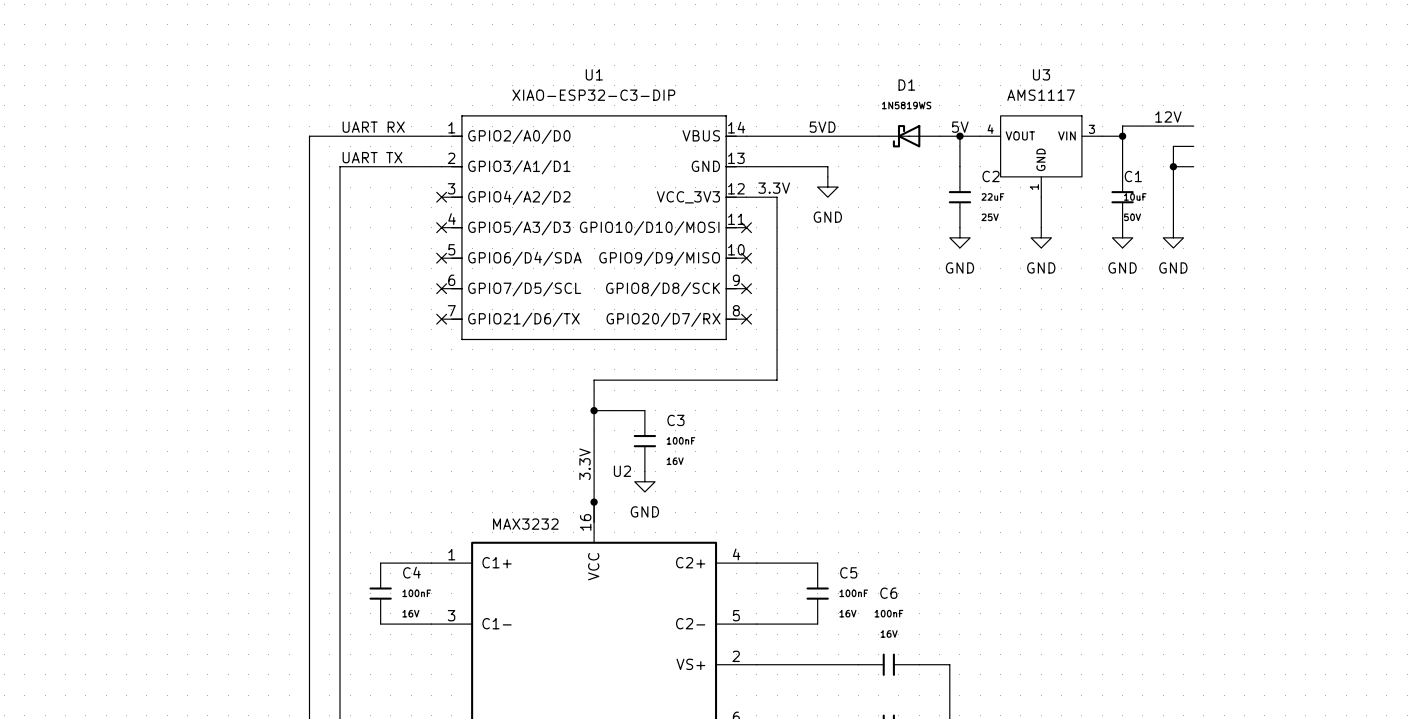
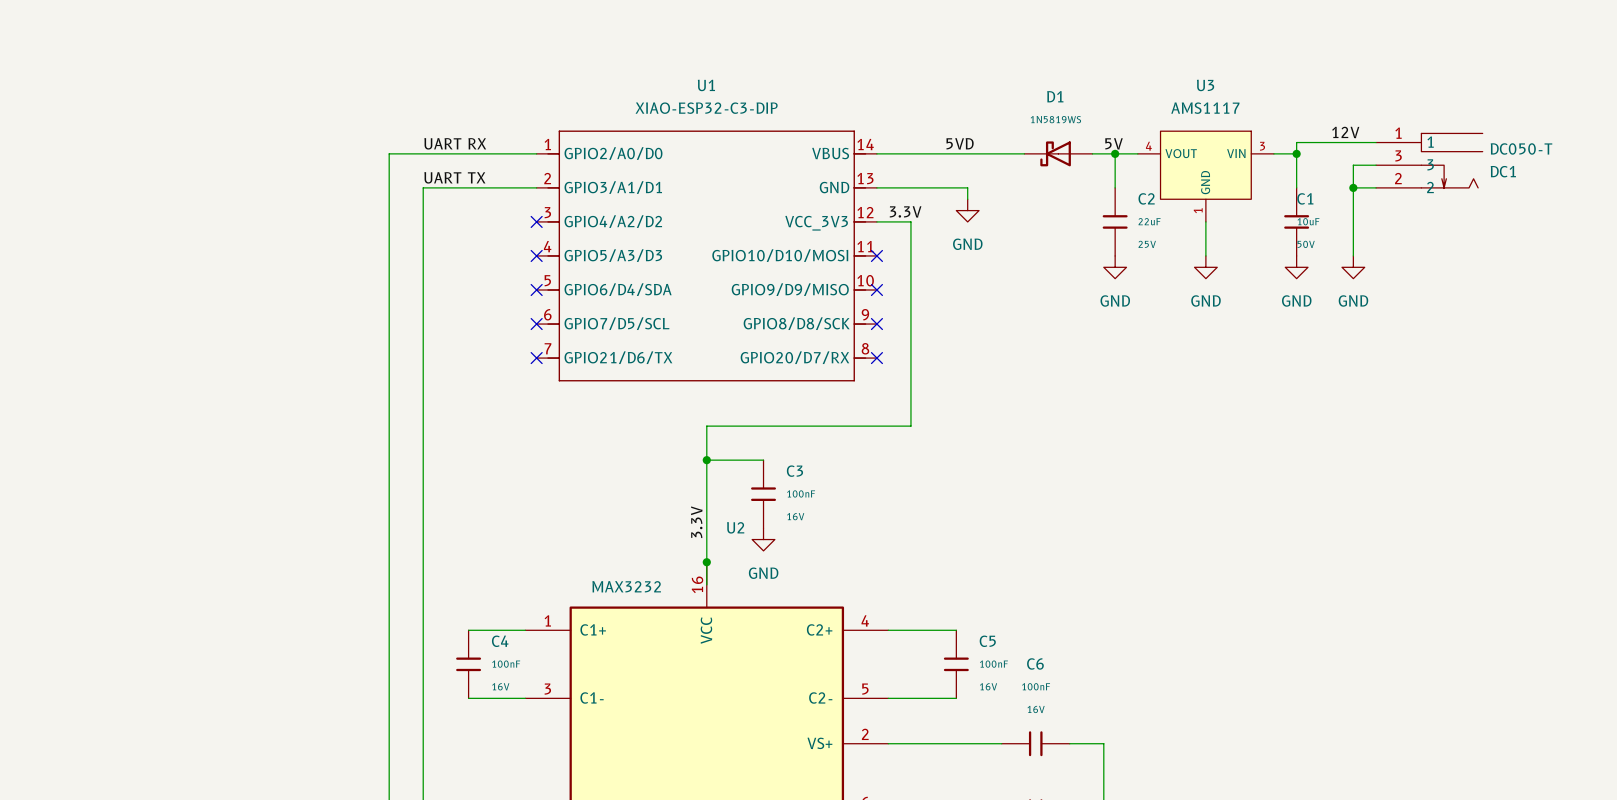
DC1: none -> DC050-T (1429, 160)

